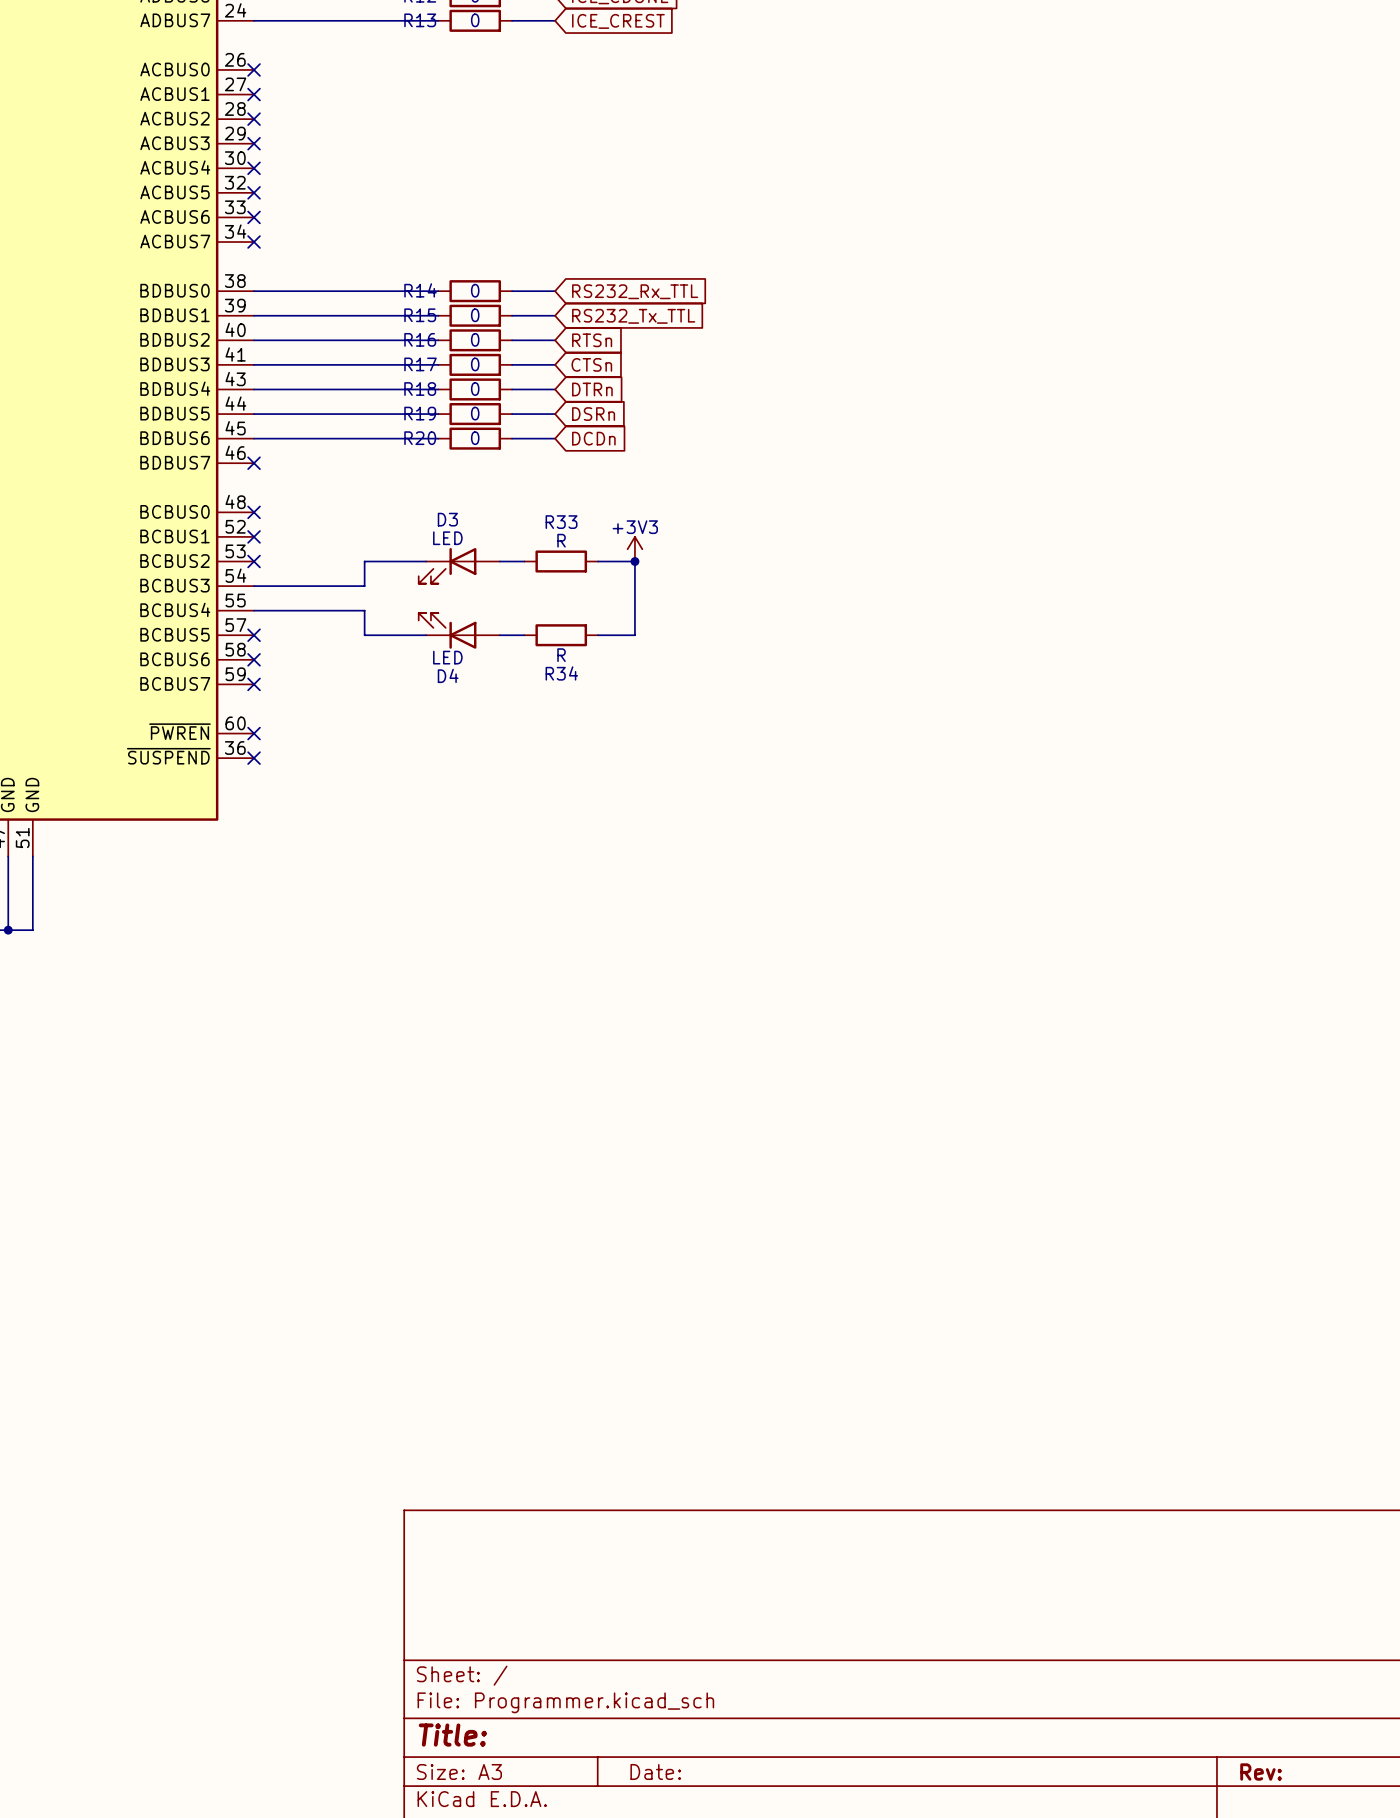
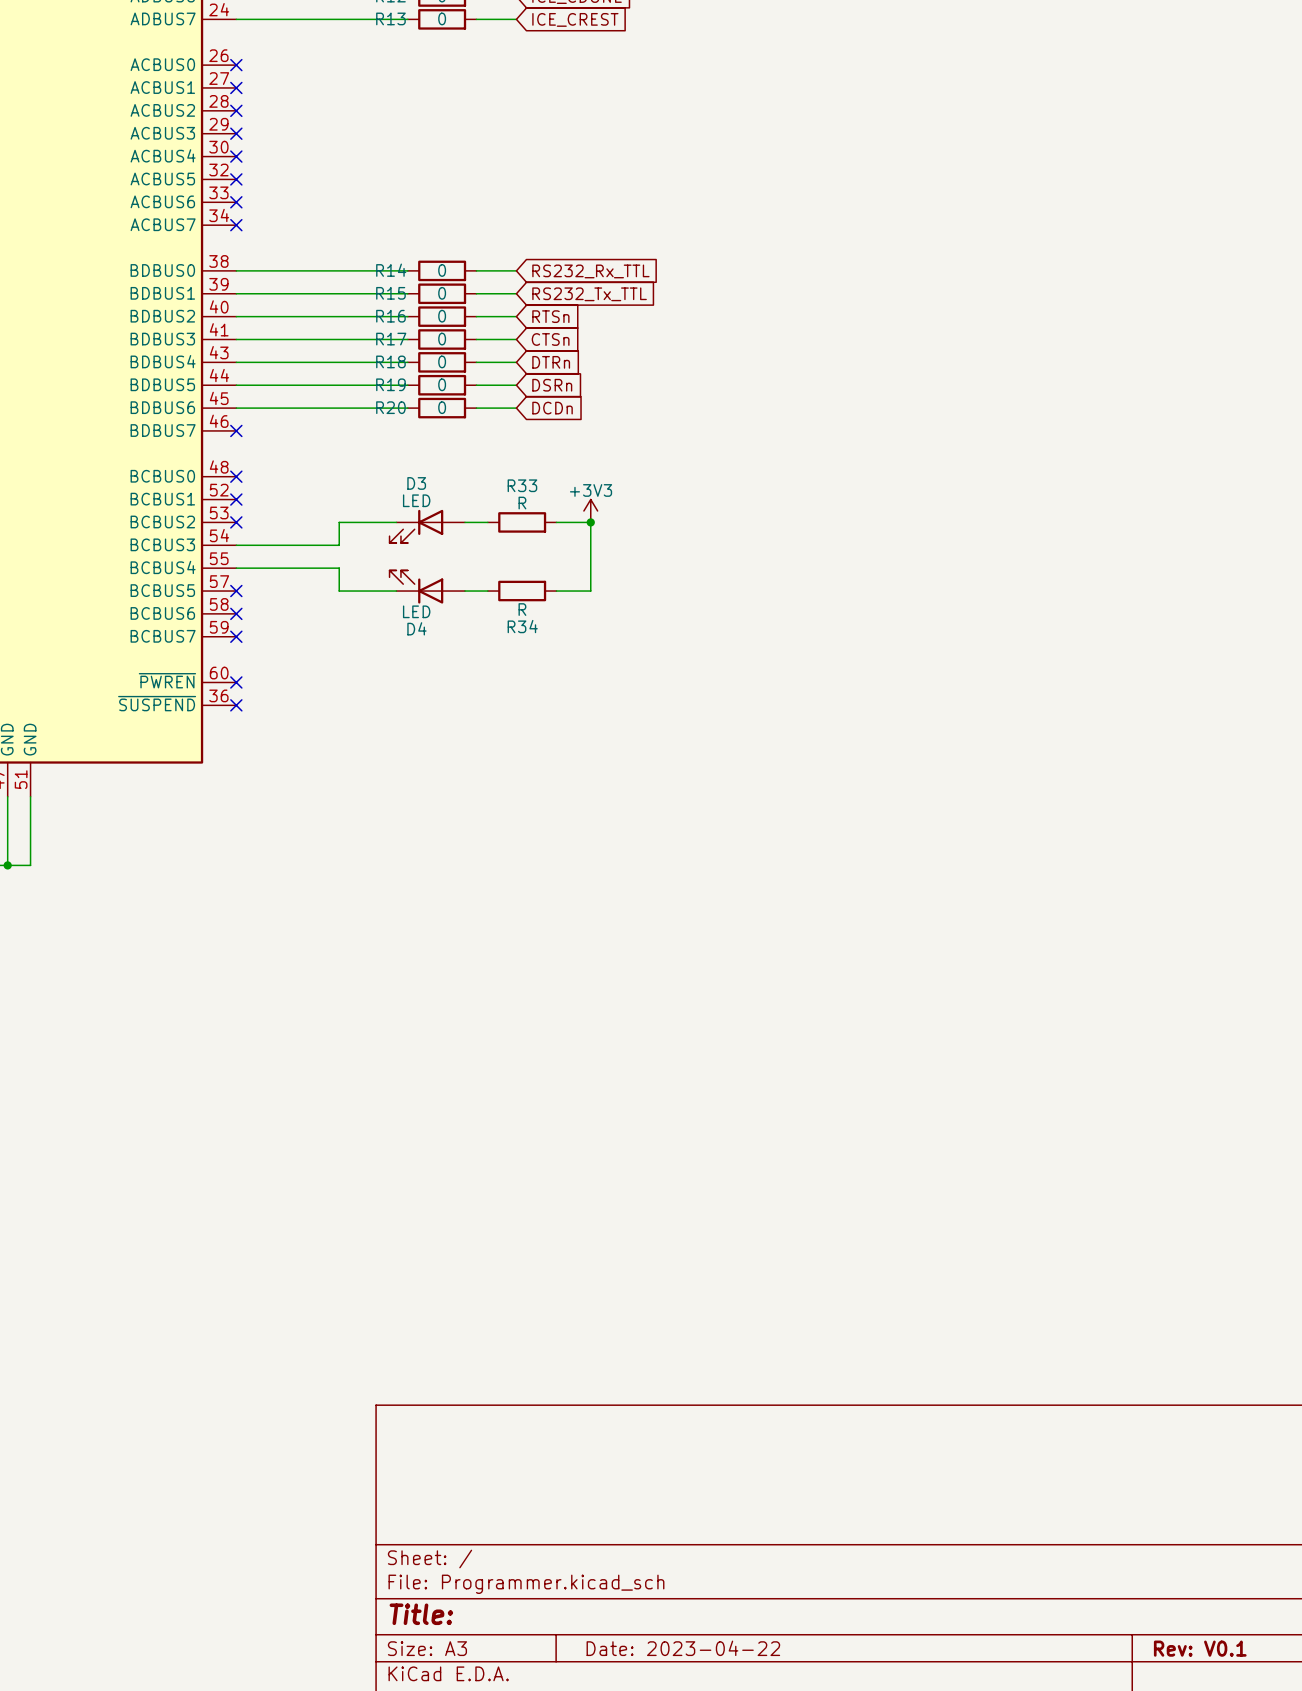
title block: Date: (655, 1772) -> Date: 2023-04-22 (683, 1648)
title block: Rev: (1261, 1772) -> Rev: V0.1 (1200, 1648)

